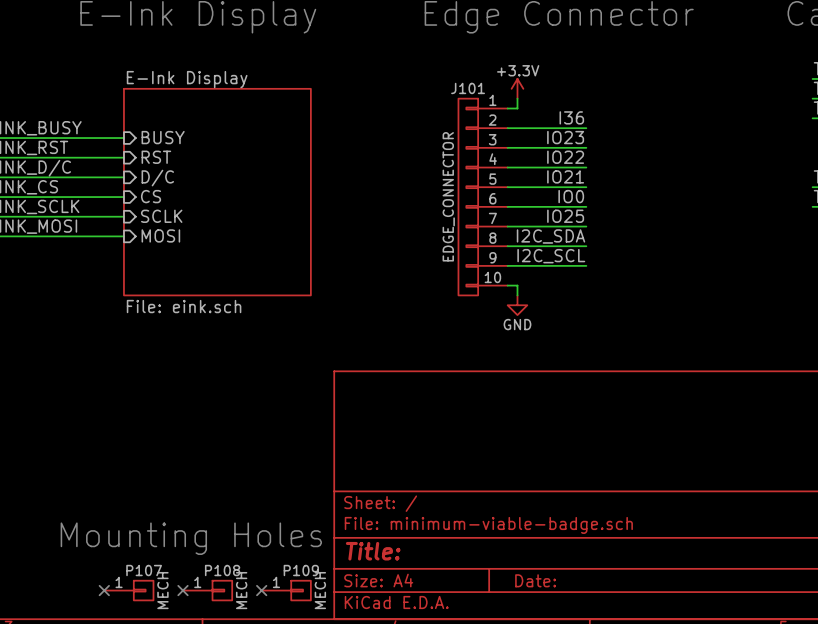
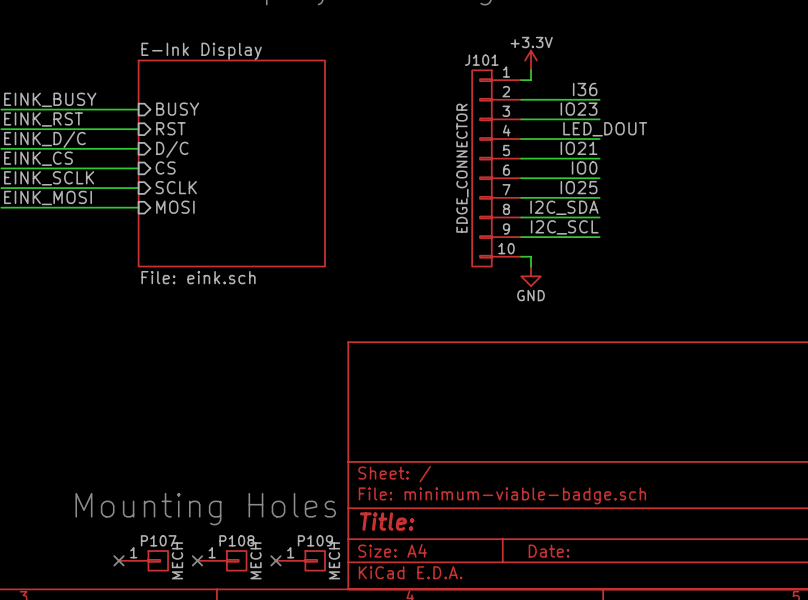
label: IO22 (565, 157) -> none
label: none -> LED_DOUT (605, 129)

